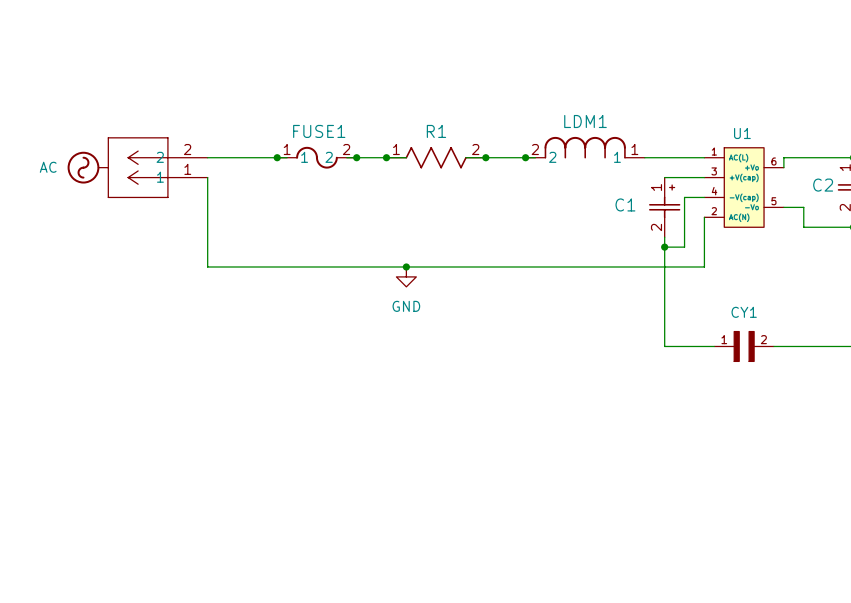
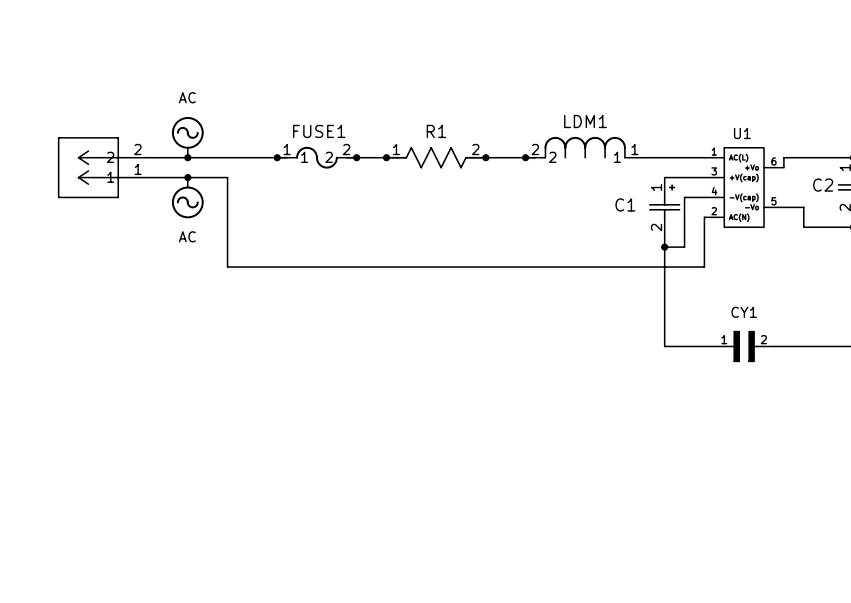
power symbol: none -> AC (187, 137)
junction: none -> (187, 157)
power symbol: AC (87, 167) -> none
part position: (157, 167) -> (108, 167)
junction: none -> (187, 177)
wire: (207, 177) (207, 266) (227, 266) -> (158, 177) (227, 177) (227, 266)
power symbol: none -> AC (187, 197)
junction: (406, 266) -> none
power symbol: GND (406, 276) -> none

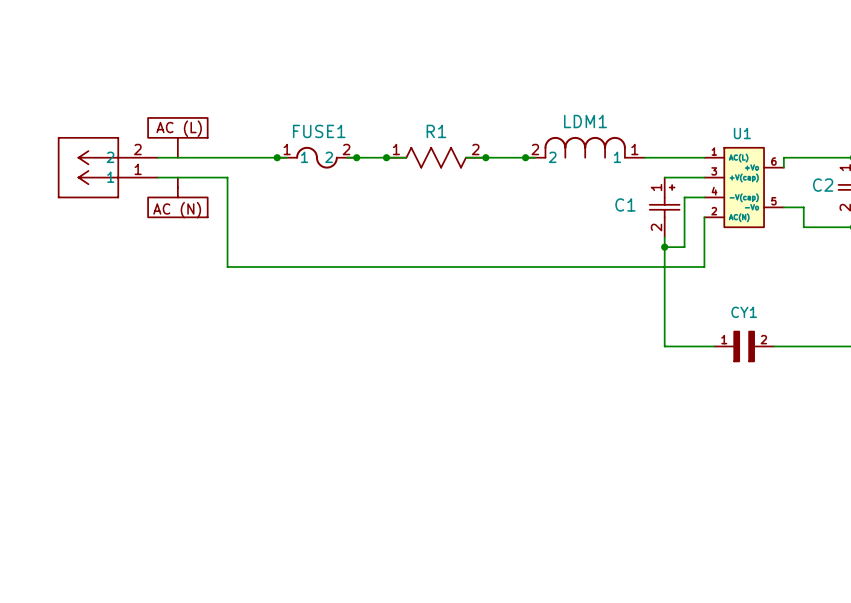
part: none -> (177, 137)
power symbol: AC (187, 137) -> none
junction: (187, 157) -> none
junction: (187, 177) -> none
part: none -> (177, 197)
power symbol: AC (187, 197) -> none

